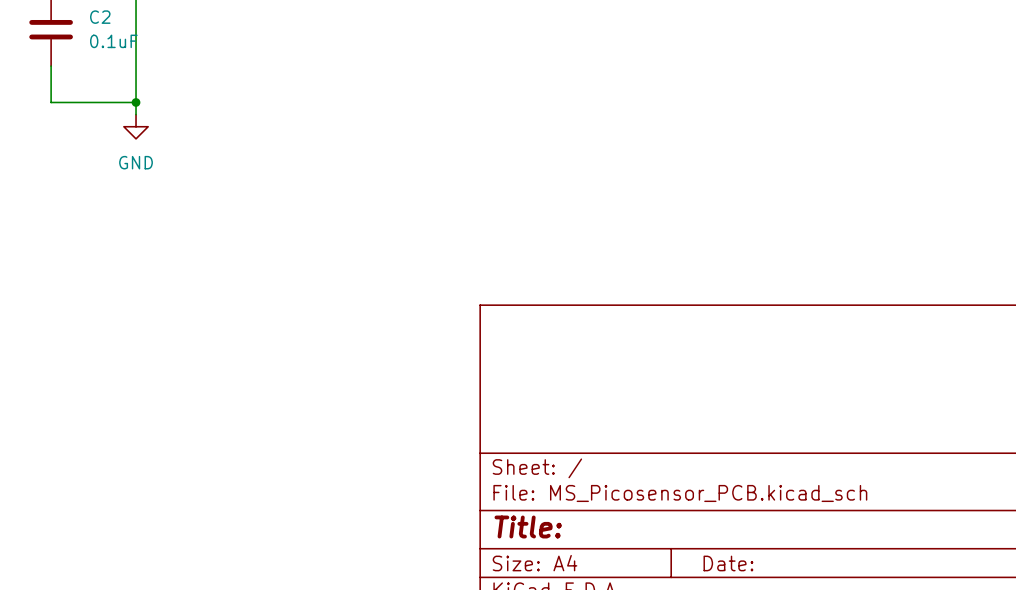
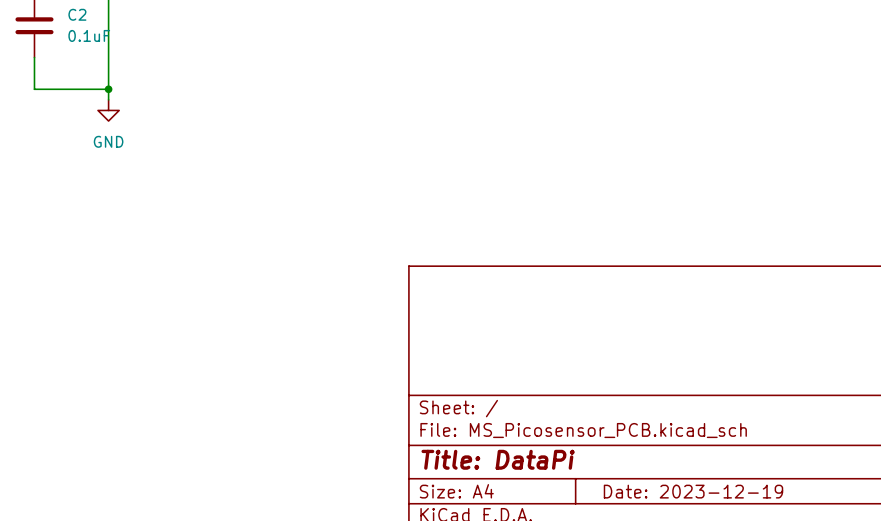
title block: Title: (528, 527) -> Title: DataPi (498, 459)
title block: Date: (728, 563) -> Date: 2023-12-19 (693, 491)

